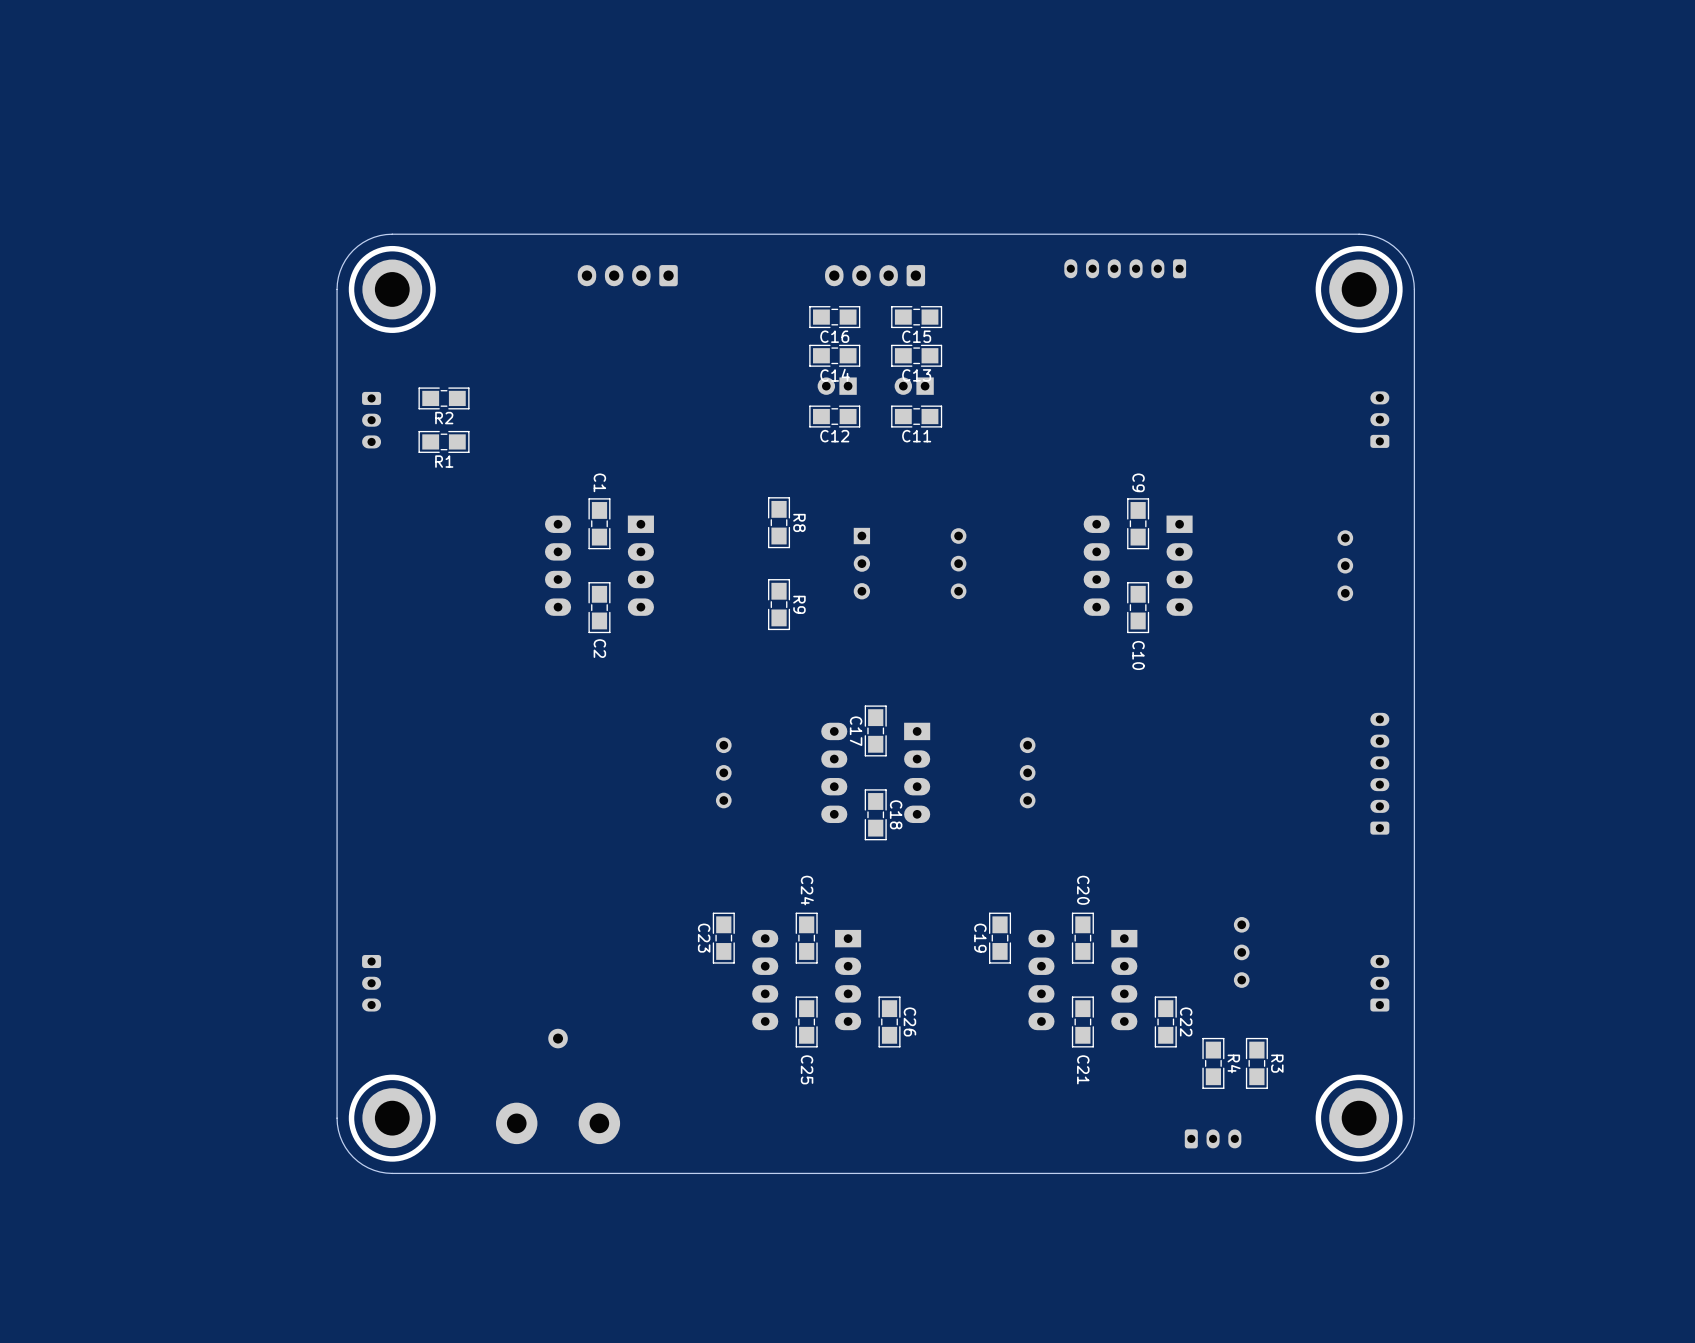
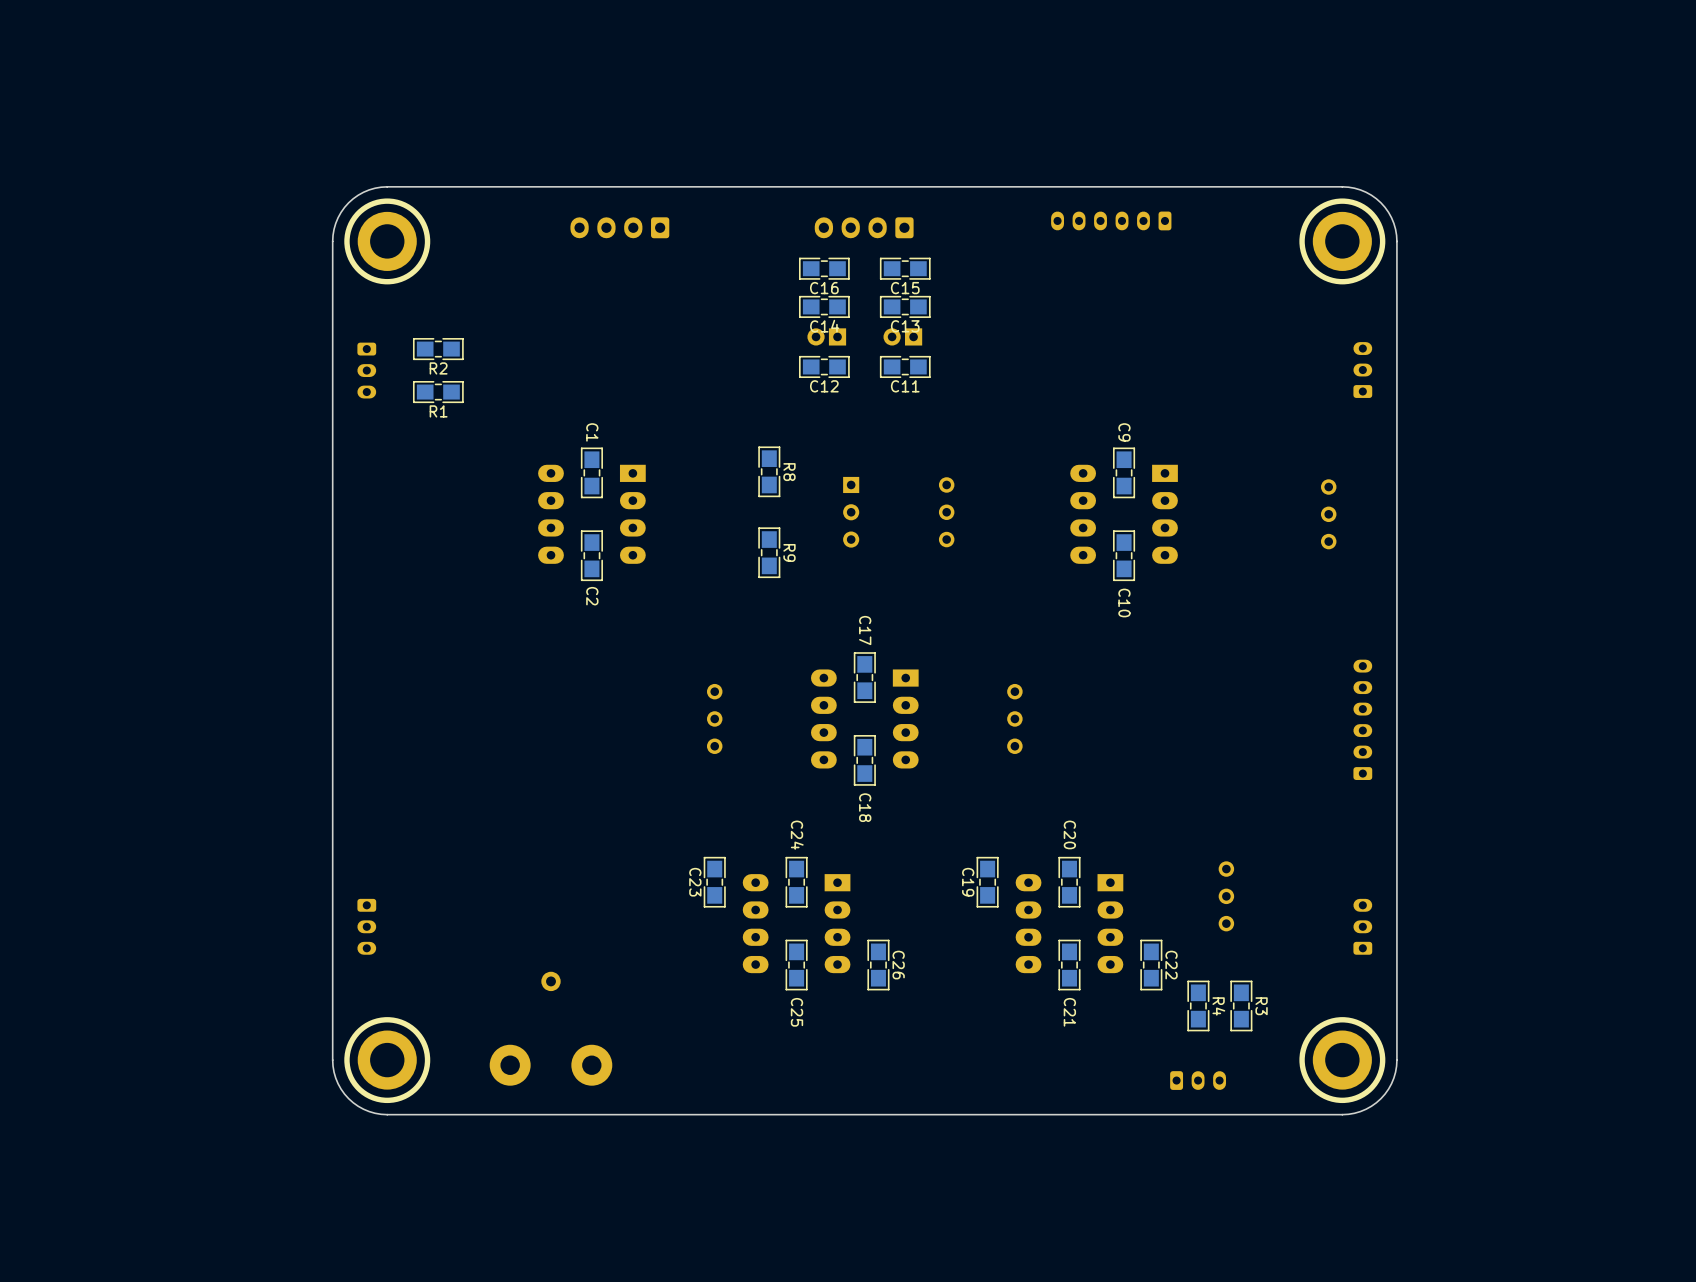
C17 name position: C17 (856, 731) -> C17 (865, 630)
C18 name position: C18 (896, 814) -> C18 (865, 807)

